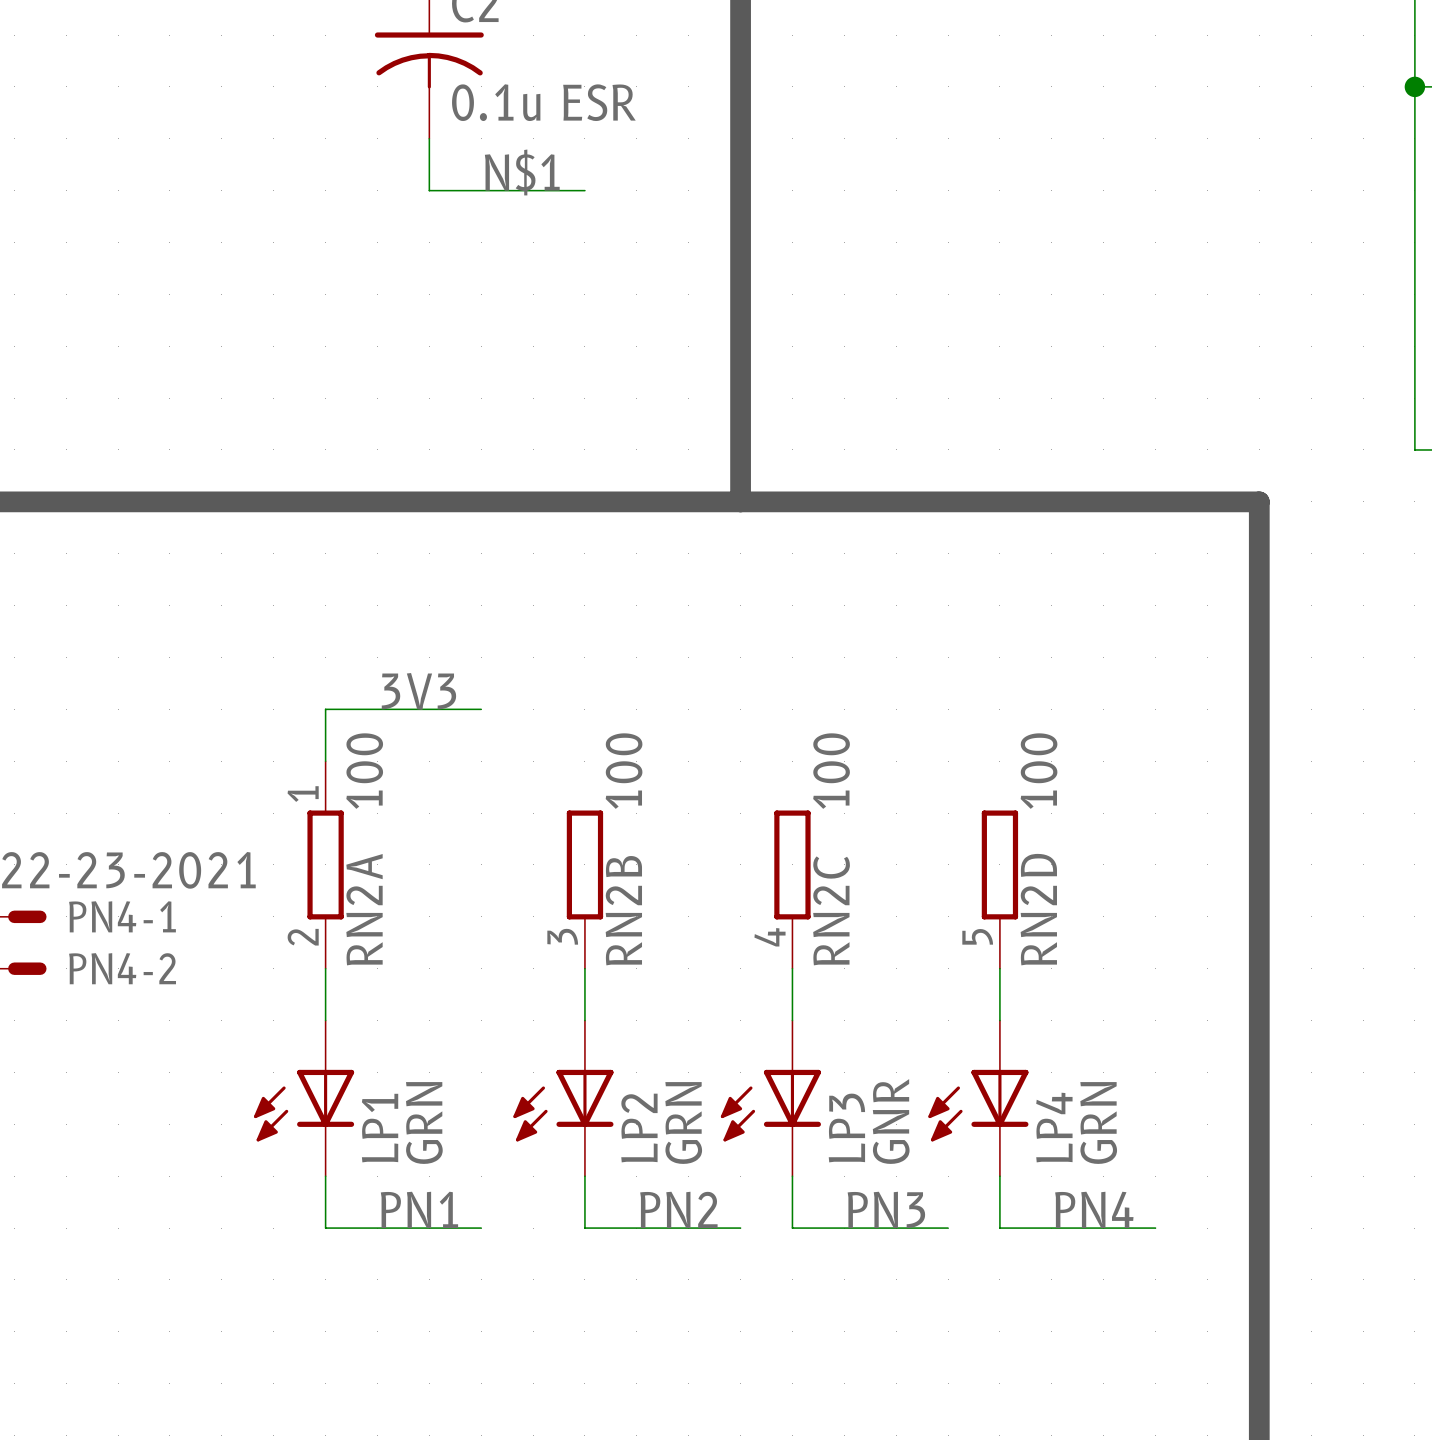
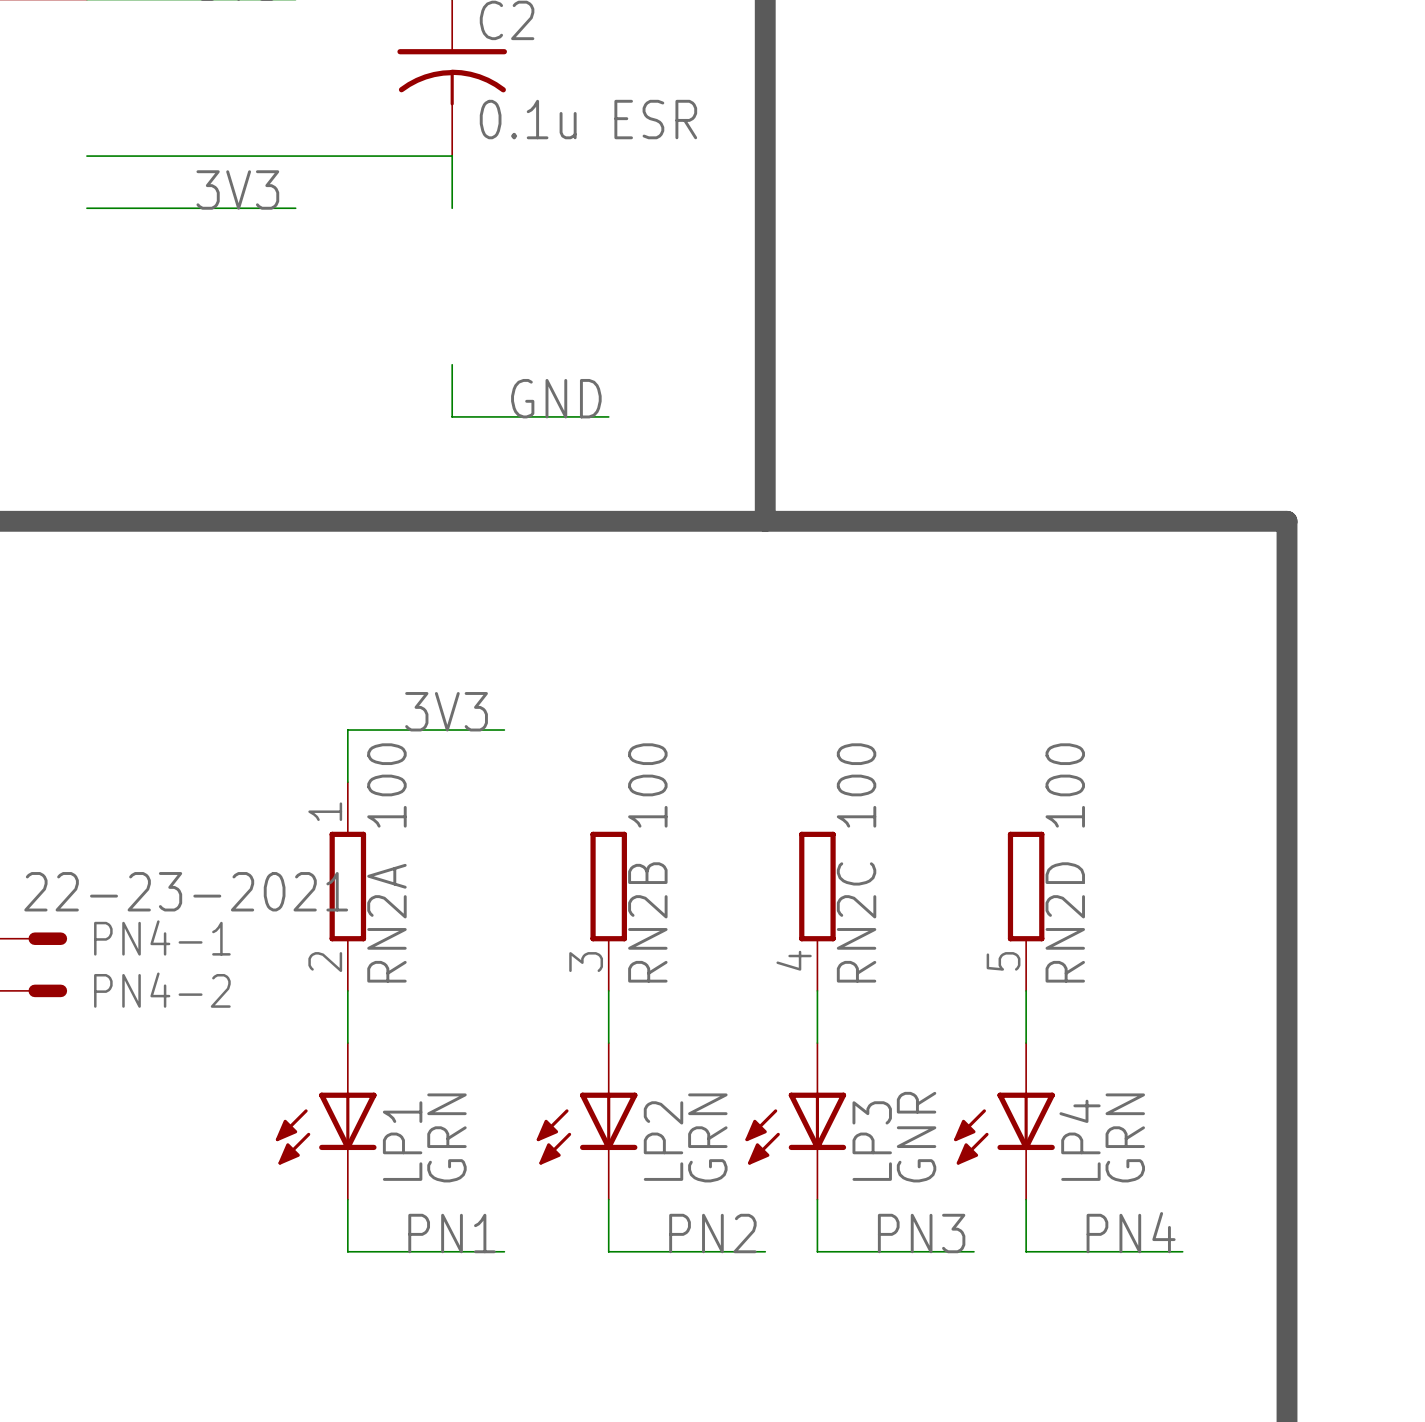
wire: none -> (86, 156) (452, 156)
label: none -> 3V3 (237, 189)
label: N$1 (522, 172) -> none
wire: none -> (86, 208) (295, 208)
wire: (429, 190) (584, 190) -> none
wire: none -> (452, 364) (452, 416) (608, 416)
label: none -> GND (556, 398)

